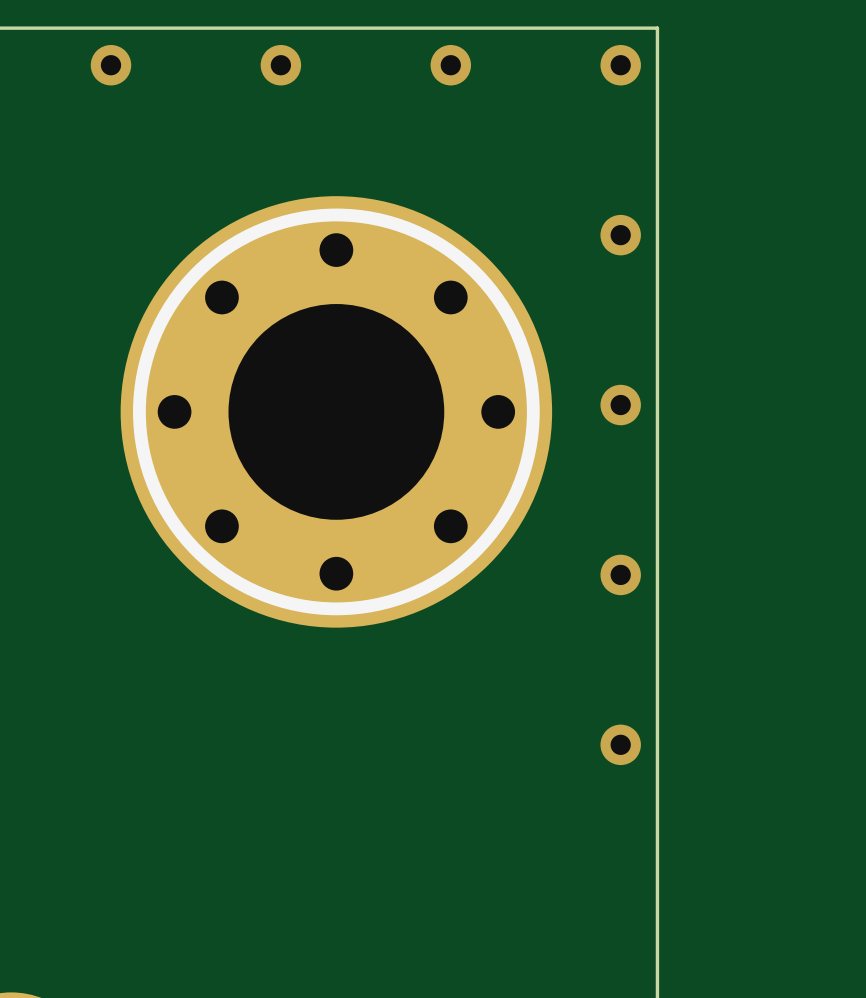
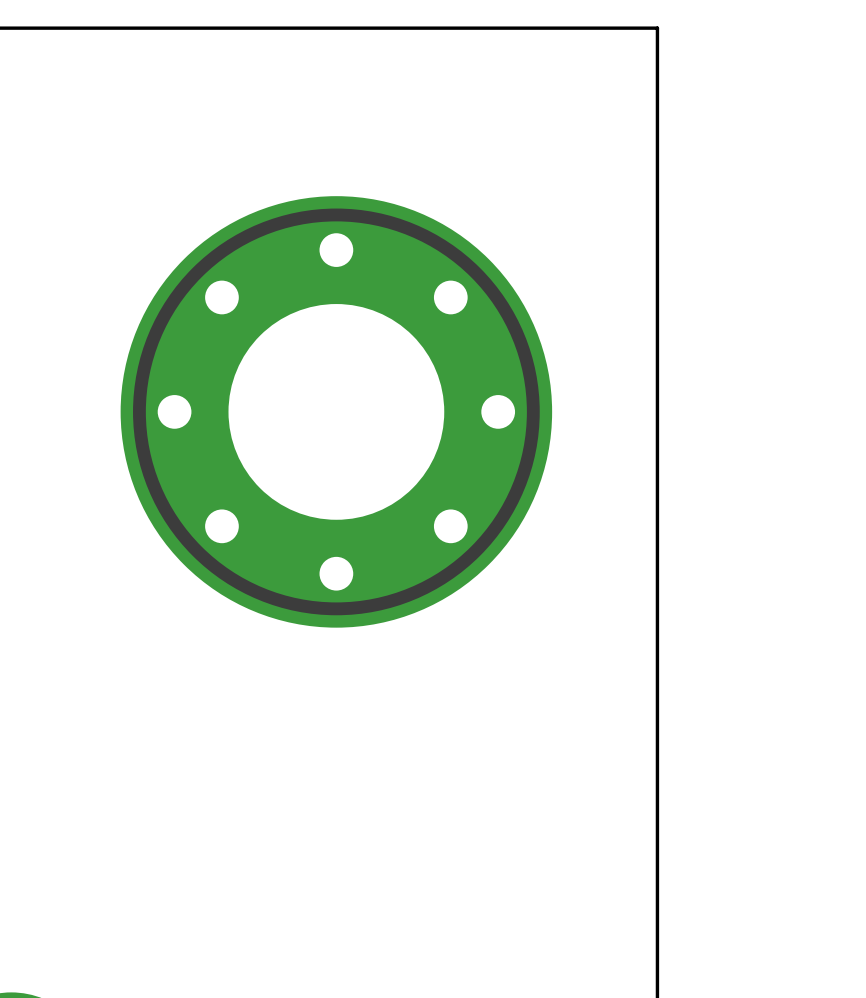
via: (110, 65) -> none
via: (280, 65) -> none
via: (450, 65) -> none
via: (620, 65) -> none
via: (620, 235) -> none
via: (620, 405) -> none
via: (620, 574) -> none
via: (620, 744) -> none

